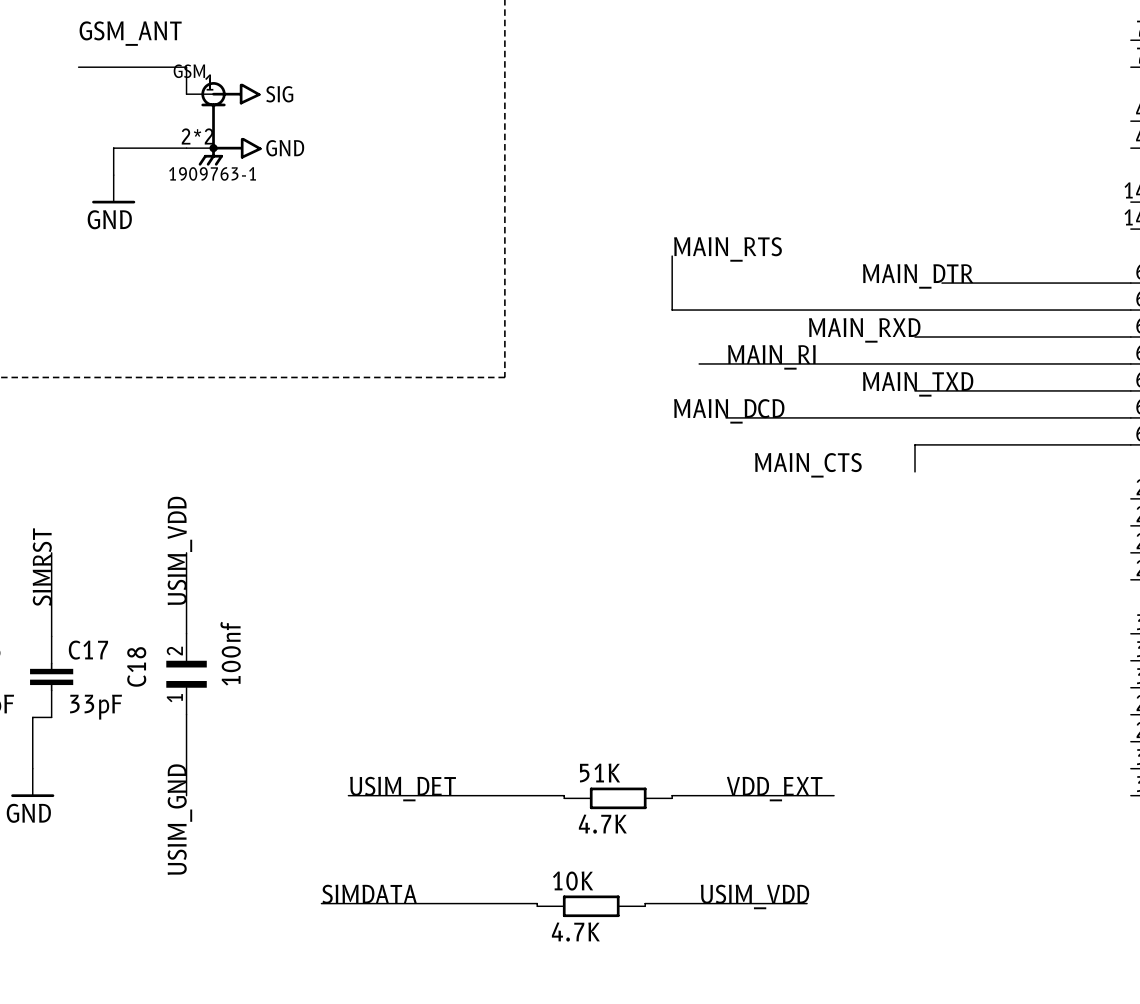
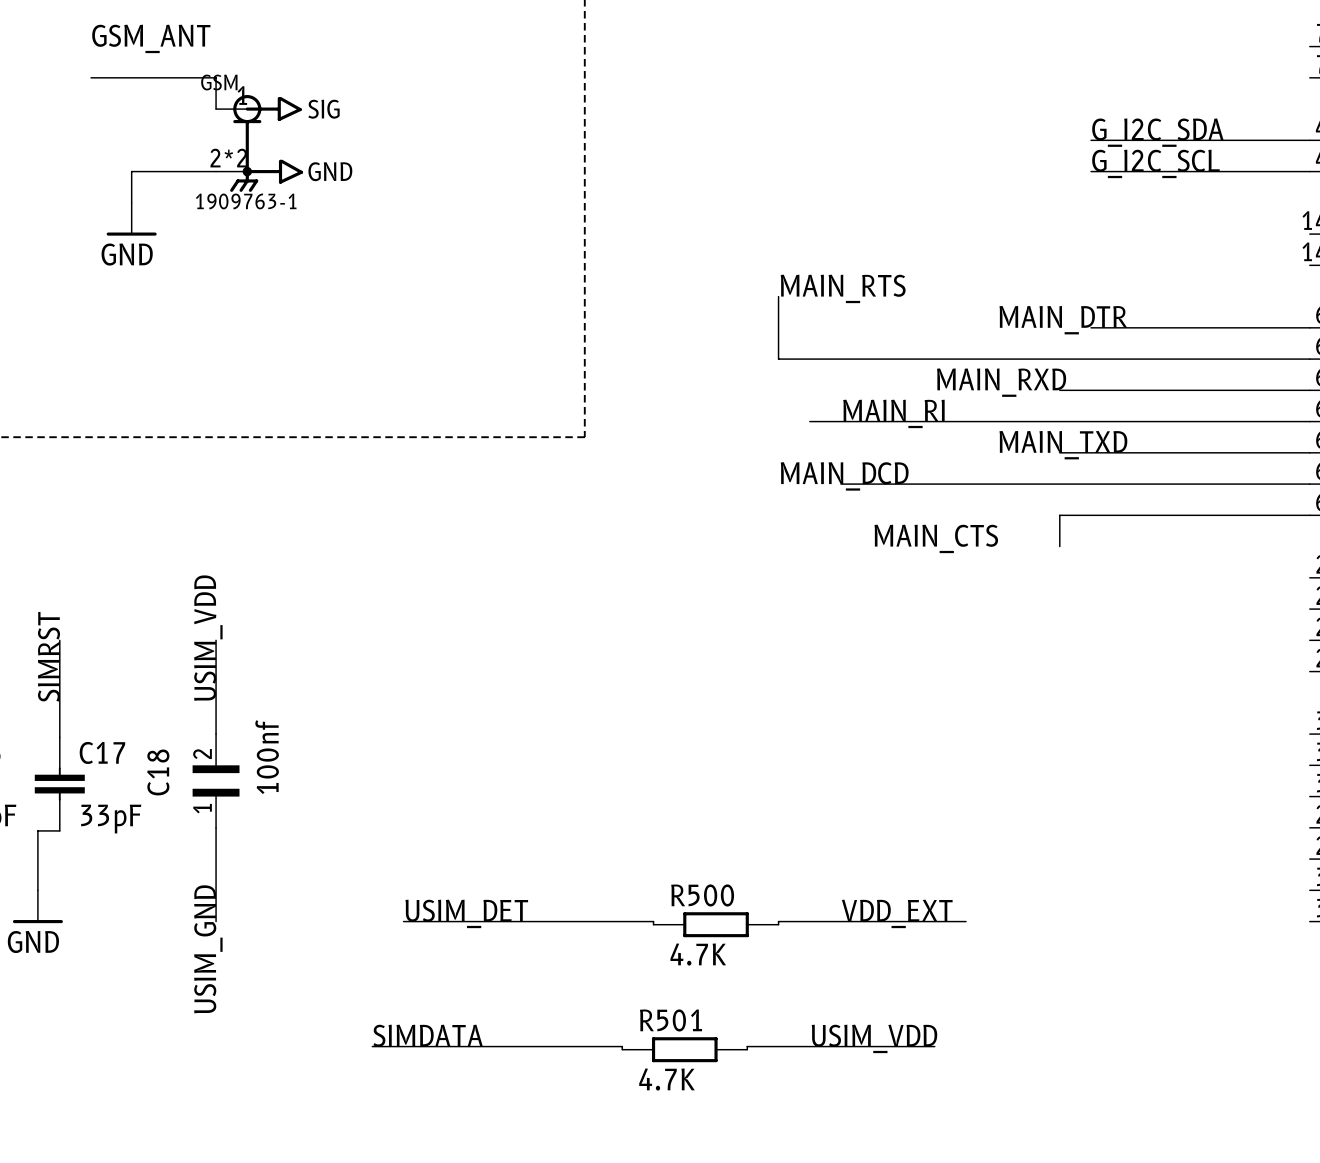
label: none -> G_I2C_SDA (1157, 132)
wire: none -> (1091, 140) (1309, 140)
label: none -> G_I2C_SCL (1155, 163)
wire: none -> (1091, 171) (1309, 171)
51K name: 51K (600, 773) -> R500 (702, 895)
10K name: 10K (573, 881) -> R501 (670, 1020)

